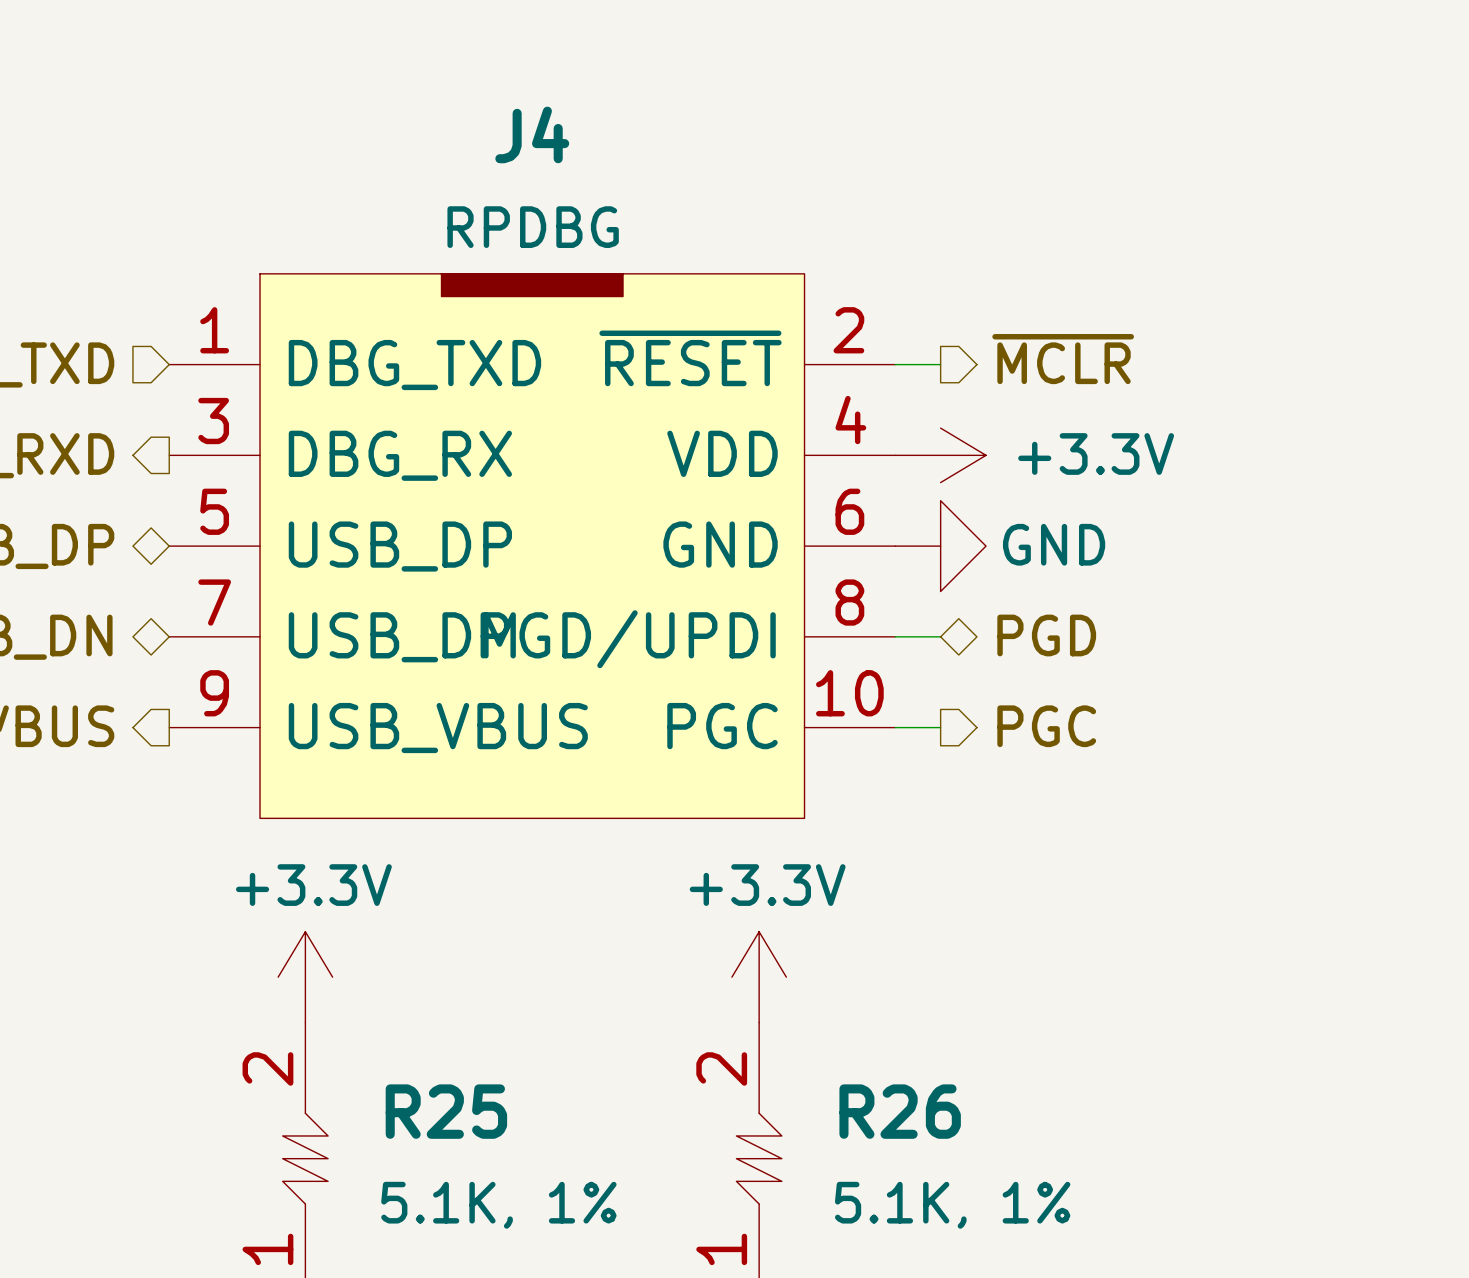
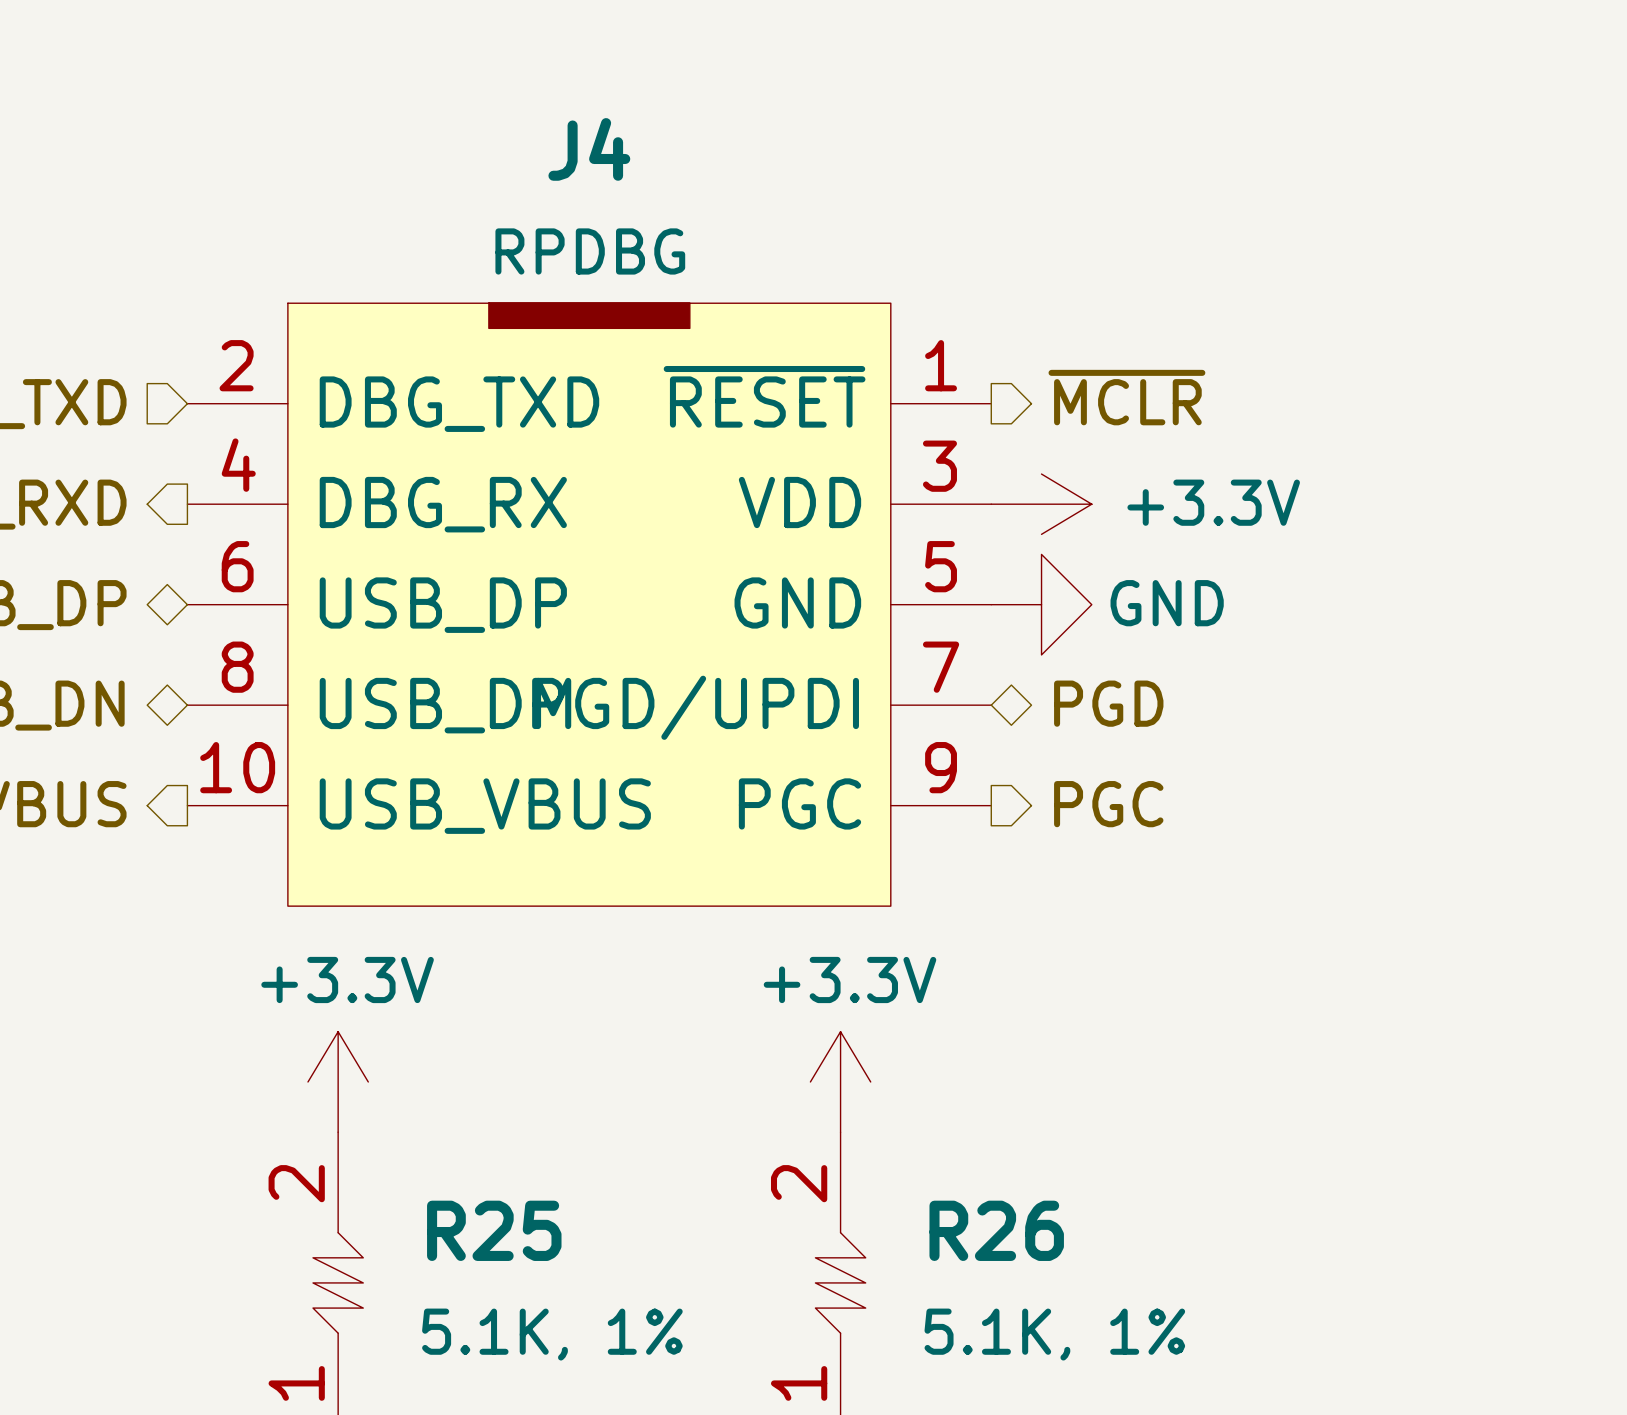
J4 symbol: [169, 273, 896, 819] -> [187, 303, 992, 907]
hierarchical label position: ~{MCLR} (1063, 359) -> ~{MCLR} (1126, 397)
wire: (895, 364) (940, 364) -> none
hierarchical label position: PGD (1046, 635) -> PGD (1108, 703)
wire: (895, 636) (940, 636) -> none
hierarchical label position: PGC (1046, 726) -> PGC (1108, 804)
wire: (895, 727) (940, 727) -> none

